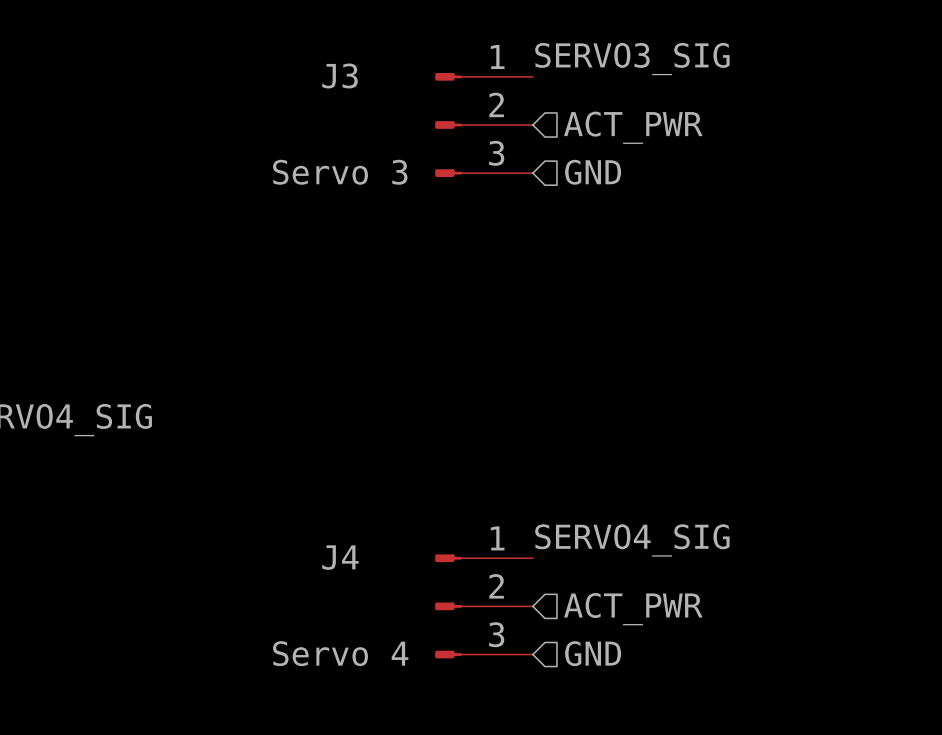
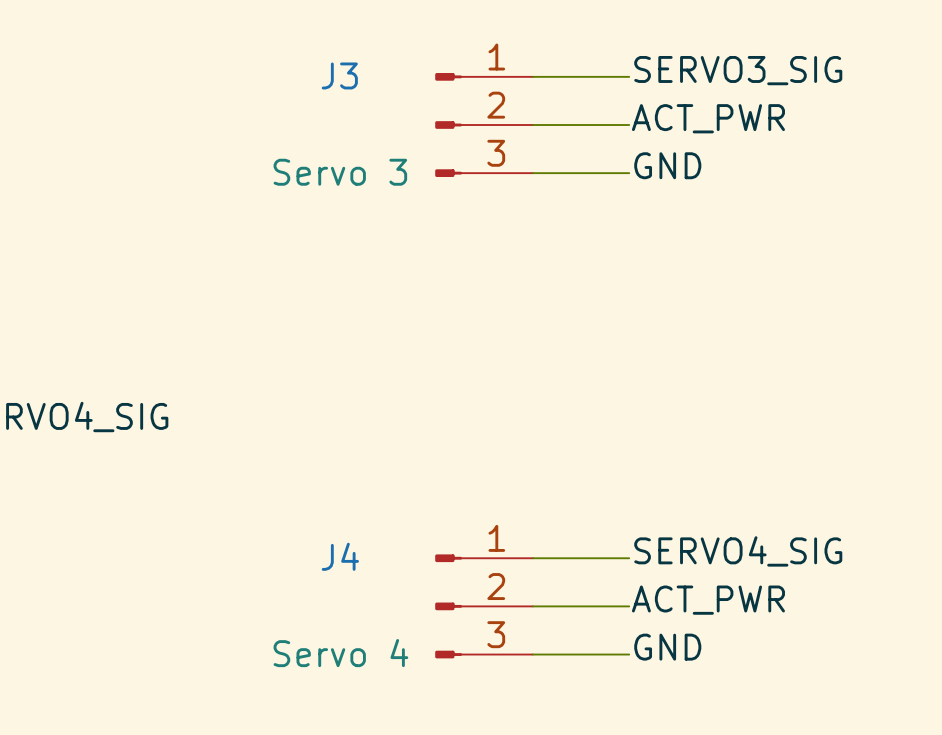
label position: SERVO3_SIG (632, 59) -> SERVO3_SIG (738, 70)
wire: none -> (532, 76) (629, 76)
label: none -> ACT_PWR (708, 118)
wire: none -> (532, 125) (629, 125)
hierarchical label: ACT_PWR (633, 127) -> none
label: none -> GND (667, 165)
hierarchical label: GND (593, 172) -> none
wire: none -> (532, 173) (629, 173)
label position: SERVO4_SIG (632, 540) -> SERVO4_SIG (738, 551)
wire: none -> (532, 558) (629, 558)
label: none -> ACT_PWR (708, 600)
wire: none -> (532, 606) (629, 606)
hierarchical label: ACT_PWR (633, 609) -> none
label: none -> GND (667, 647)
hierarchical label: GND (593, 653) -> none
wire: none -> (532, 654) (629, 654)

